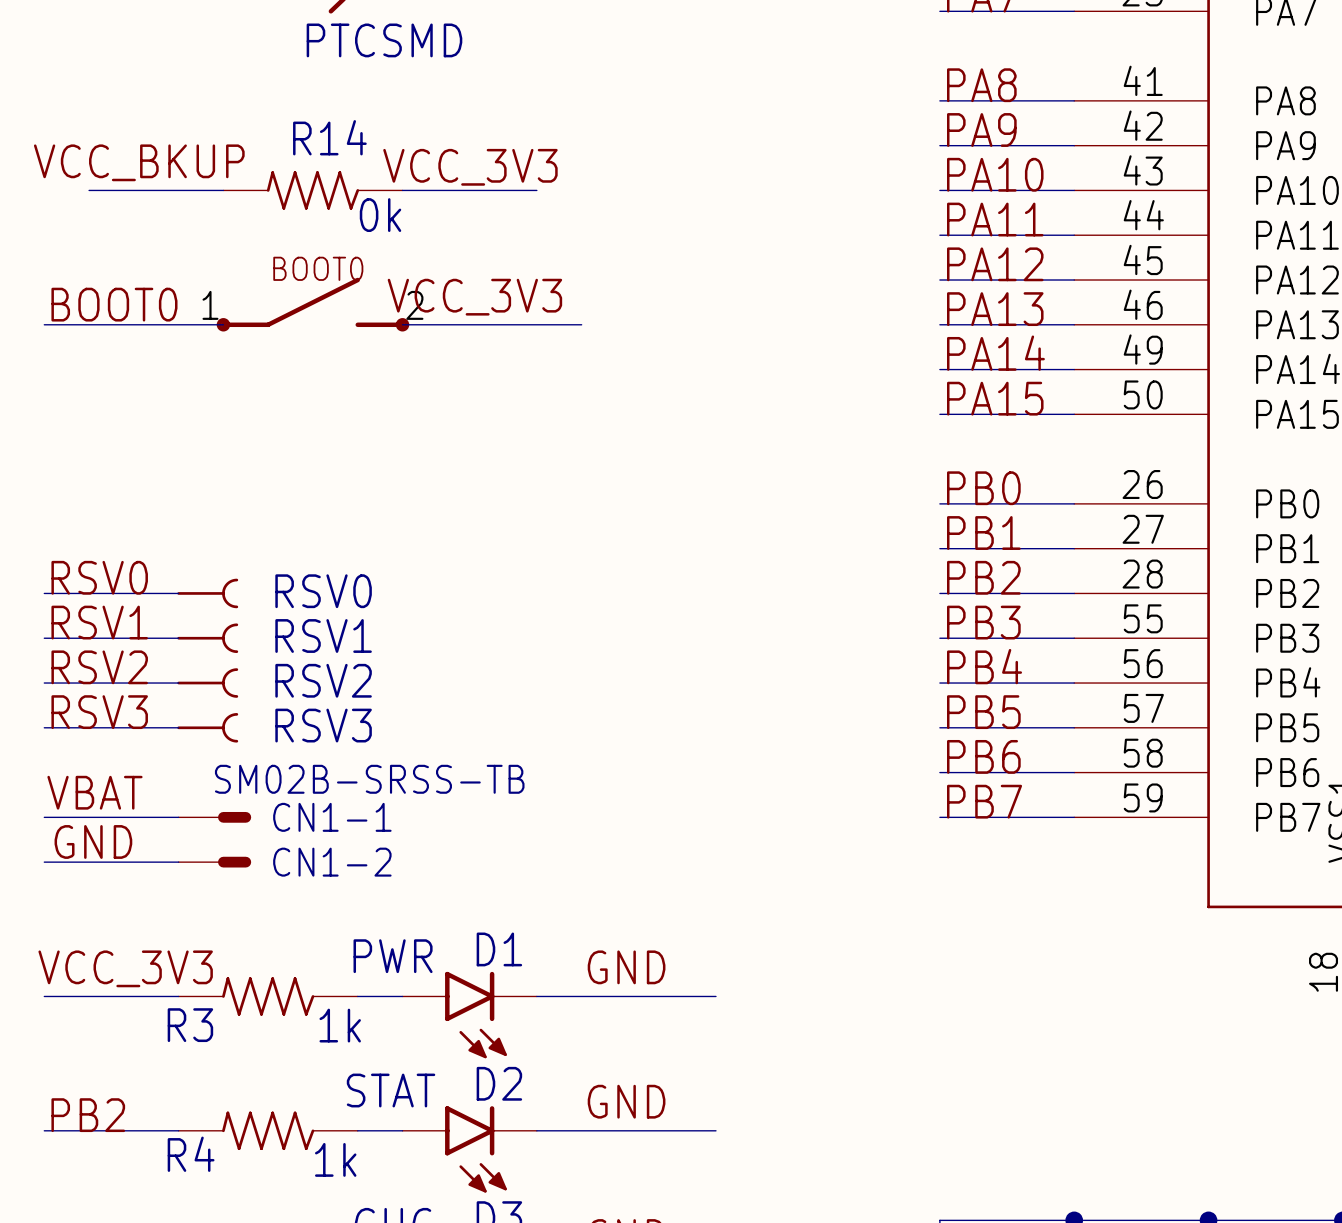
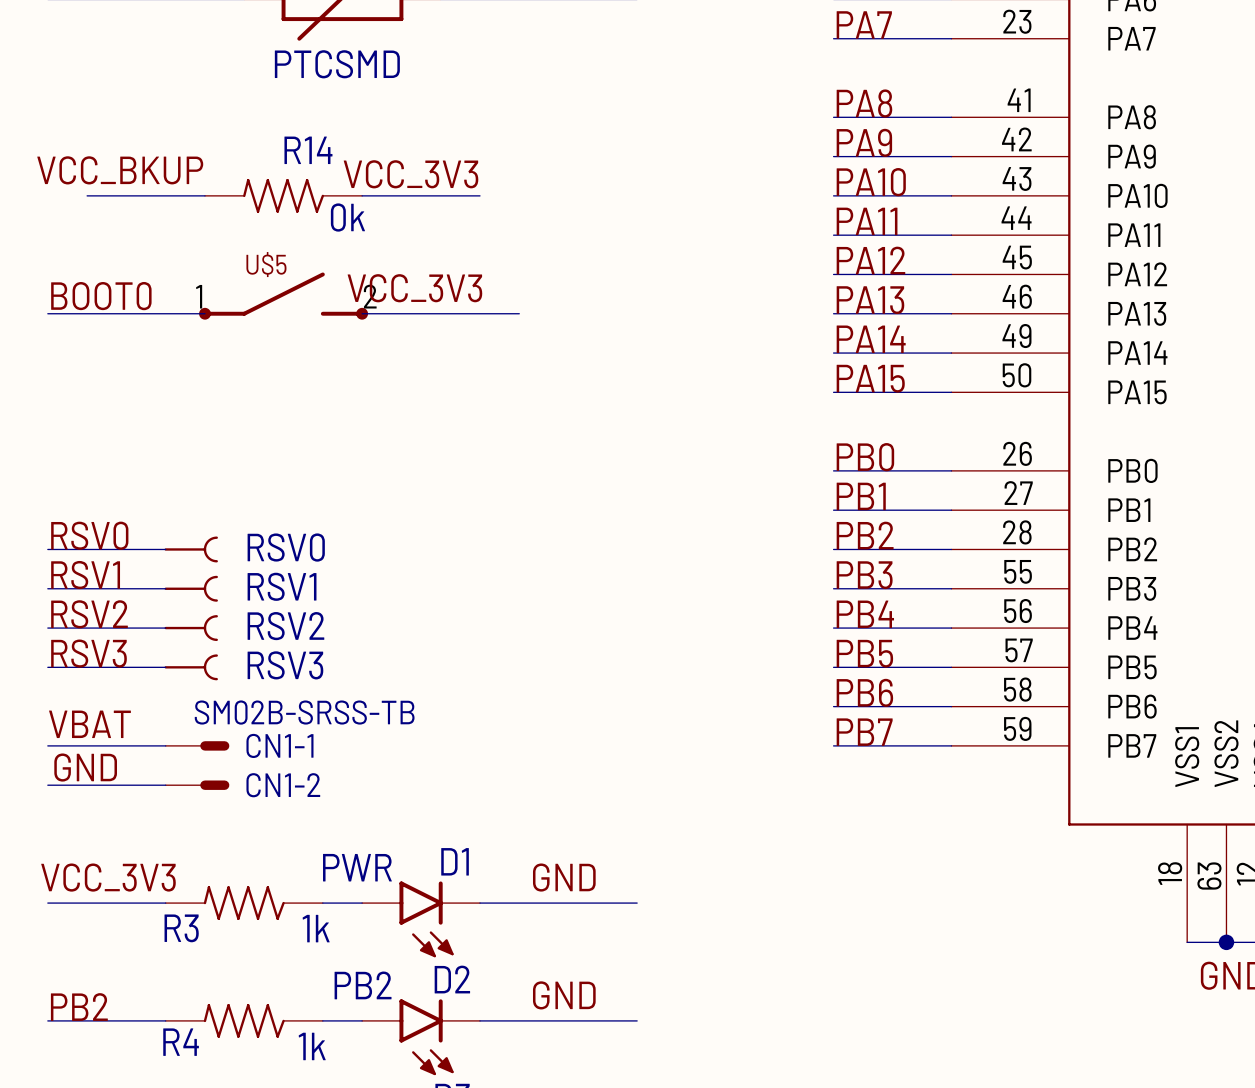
BOOT0 name: BOOT0 (318, 268) -> U$5 (266, 264)
D2 value: STAT (391, 1090) -> PB2 (363, 985)

